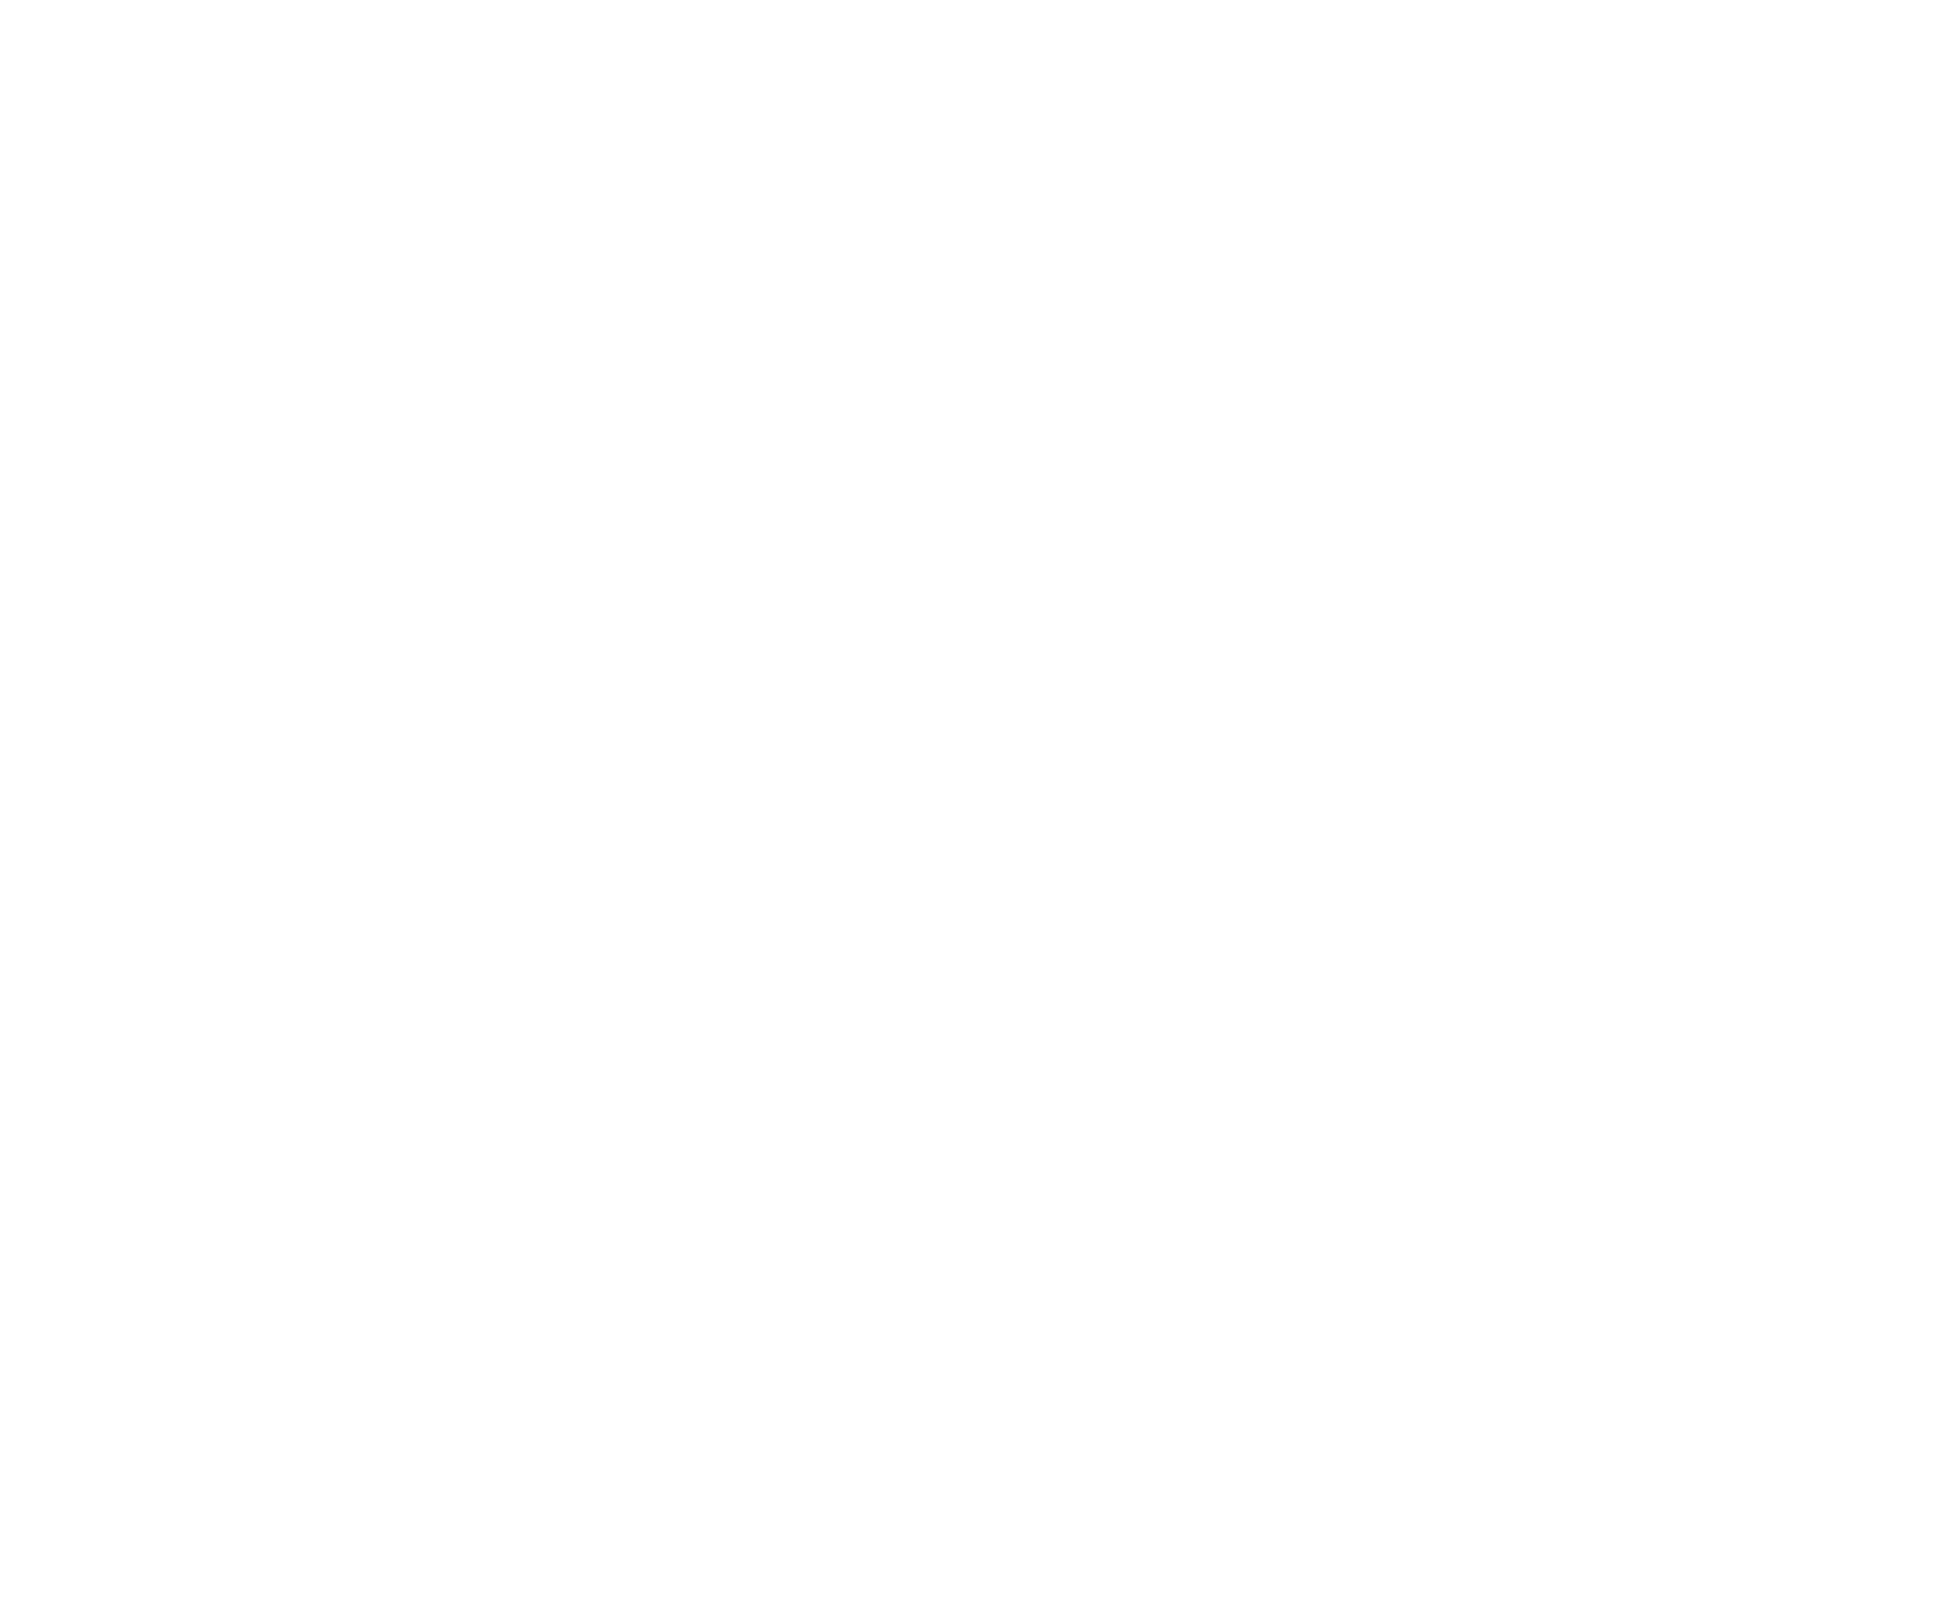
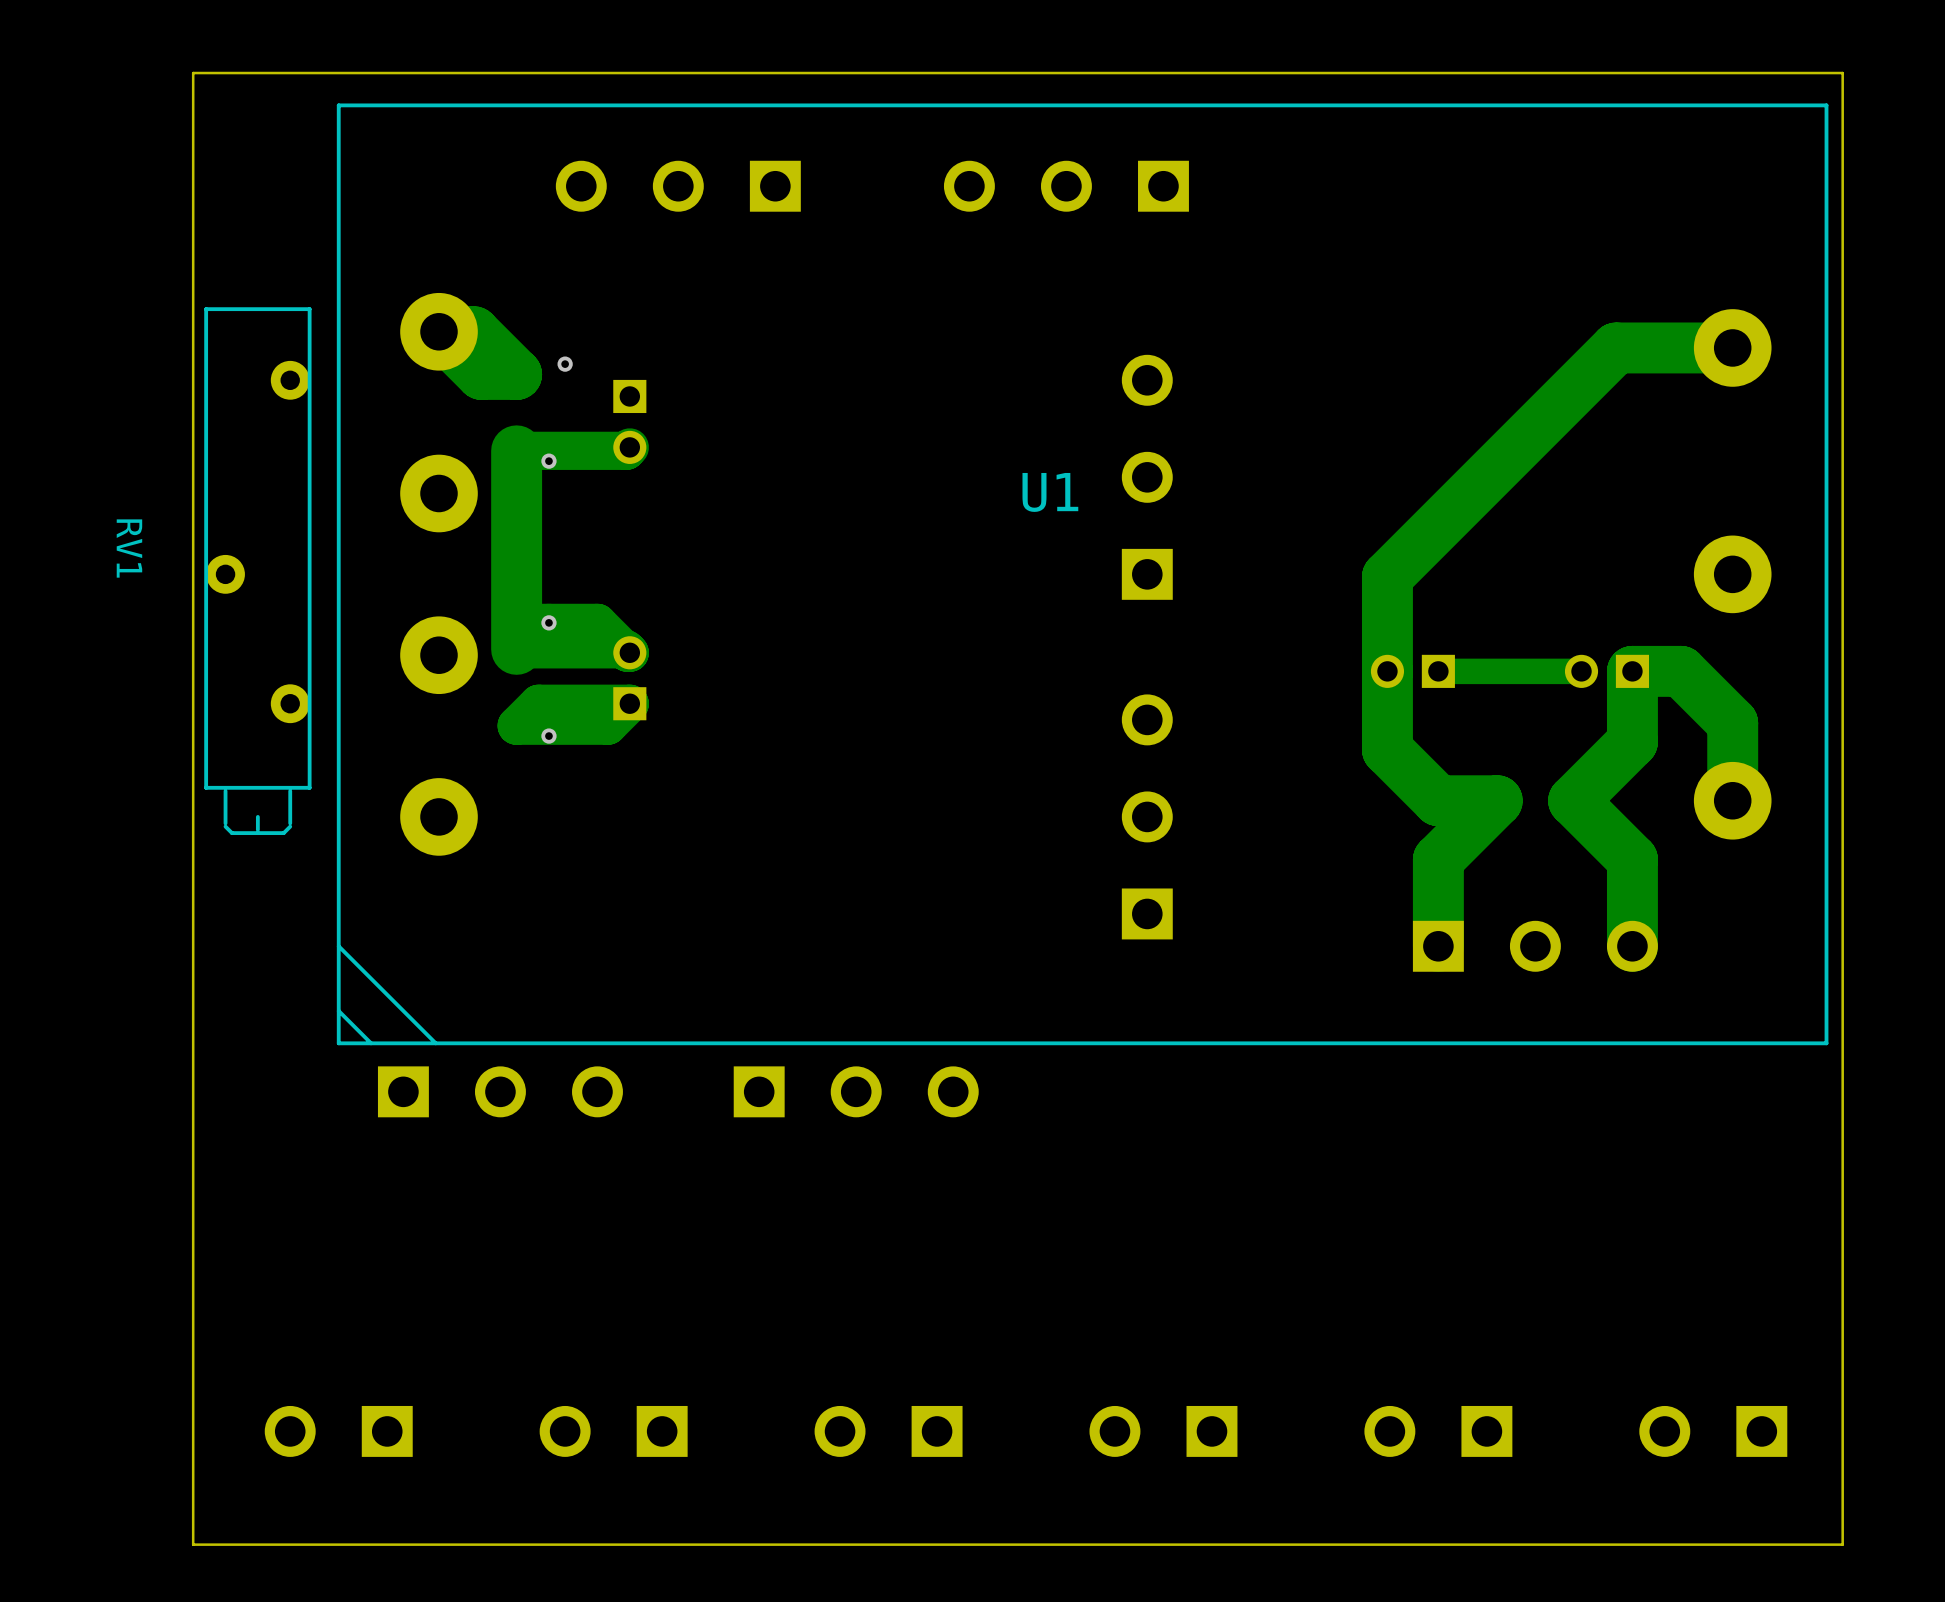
board edge: none -> (1842, 73) (1842, 1544) (193, 1544) (193, 73) (1842, 73)
part: none -> (678, 186)
part: none -> (1066, 186)
track: none -> (473, 331) (439, 331) (481, 374) (516, 374) (473, 331)
track: none -> (1732, 347) (1616, 347) (1387, 576) (1387, 749) (1438, 800) (1497, 800) (1438, 859) (1438, 946)
via: none -> (565, 364)
part: none -> (629, 421)
track: none -> (629, 447) (626, 450) (516, 450) (516, 649) (626, 649) (629, 652) (627, 652) (597, 622) (516, 622)
via: none -> (548, 461)
part: none -> (1147, 477)
RV1: none -> (257, 571)
U1: none -> (1082, 574)
via: none -> (548, 622)
part: none -> (1412, 671)
track: none -> (1581, 671) (1438, 671)
part: none -> (1606, 671)
part: none -> (629, 678)
track: none -> (629, 703) (607, 725) (516, 725) (538, 703) (629, 703)
via: none -> (548, 736)
track: none -> (1732, 800) (1732, 723) (1680, 671) (1632, 671) (1632, 741) (1573, 800) (1632, 859) (1632, 946)
part: none -> (1147, 816)
part: none -> (1535, 946)
part: none -> (500, 1091)
part: none -> (856, 1091)
part: none -> (338, 1431)
part: none -> (613, 1431)
part: none -> (888, 1431)
part: none -> (1163, 1431)
part: none -> (1438, 1431)
part: none -> (1713, 1431)

